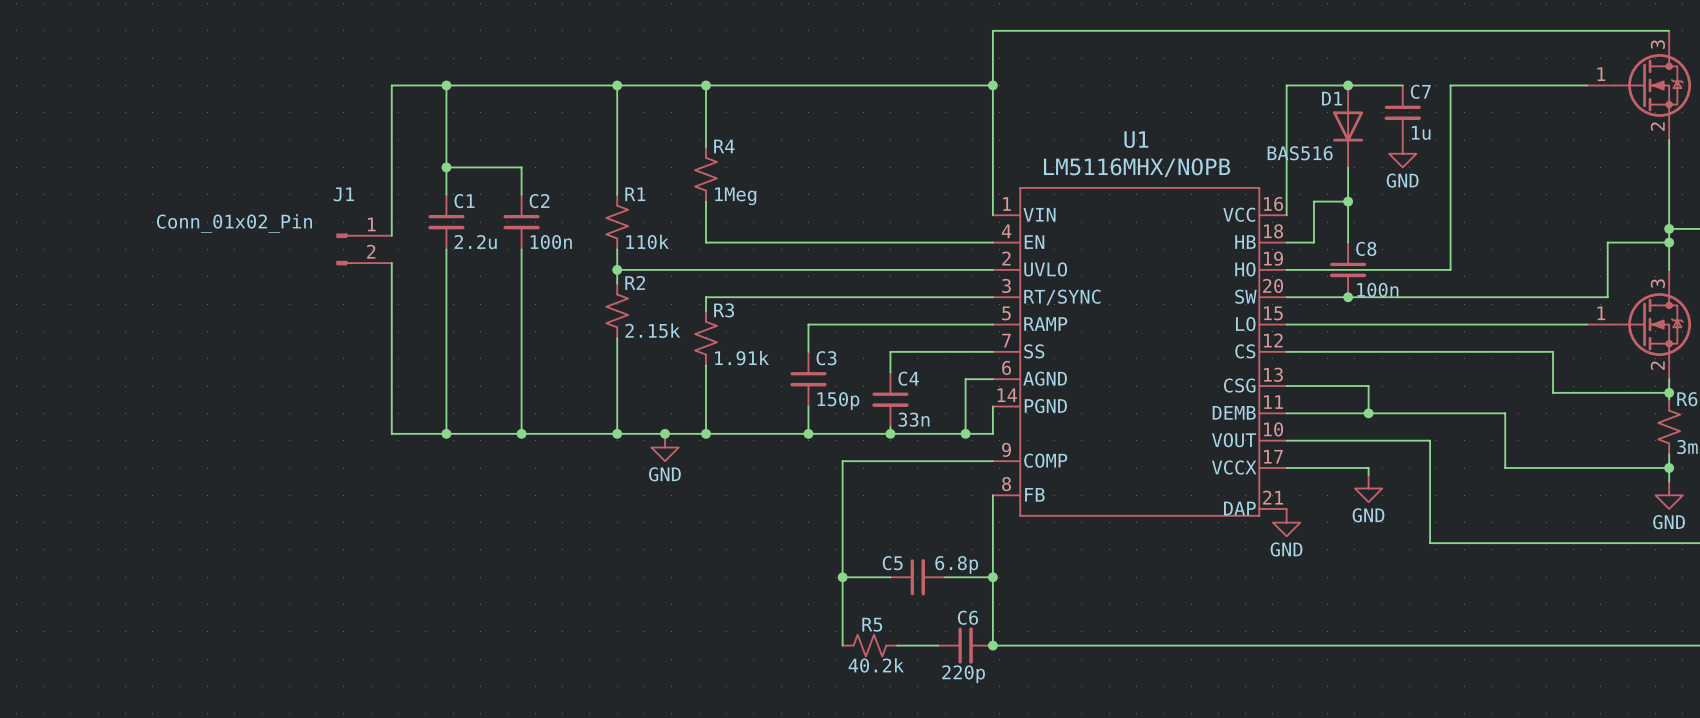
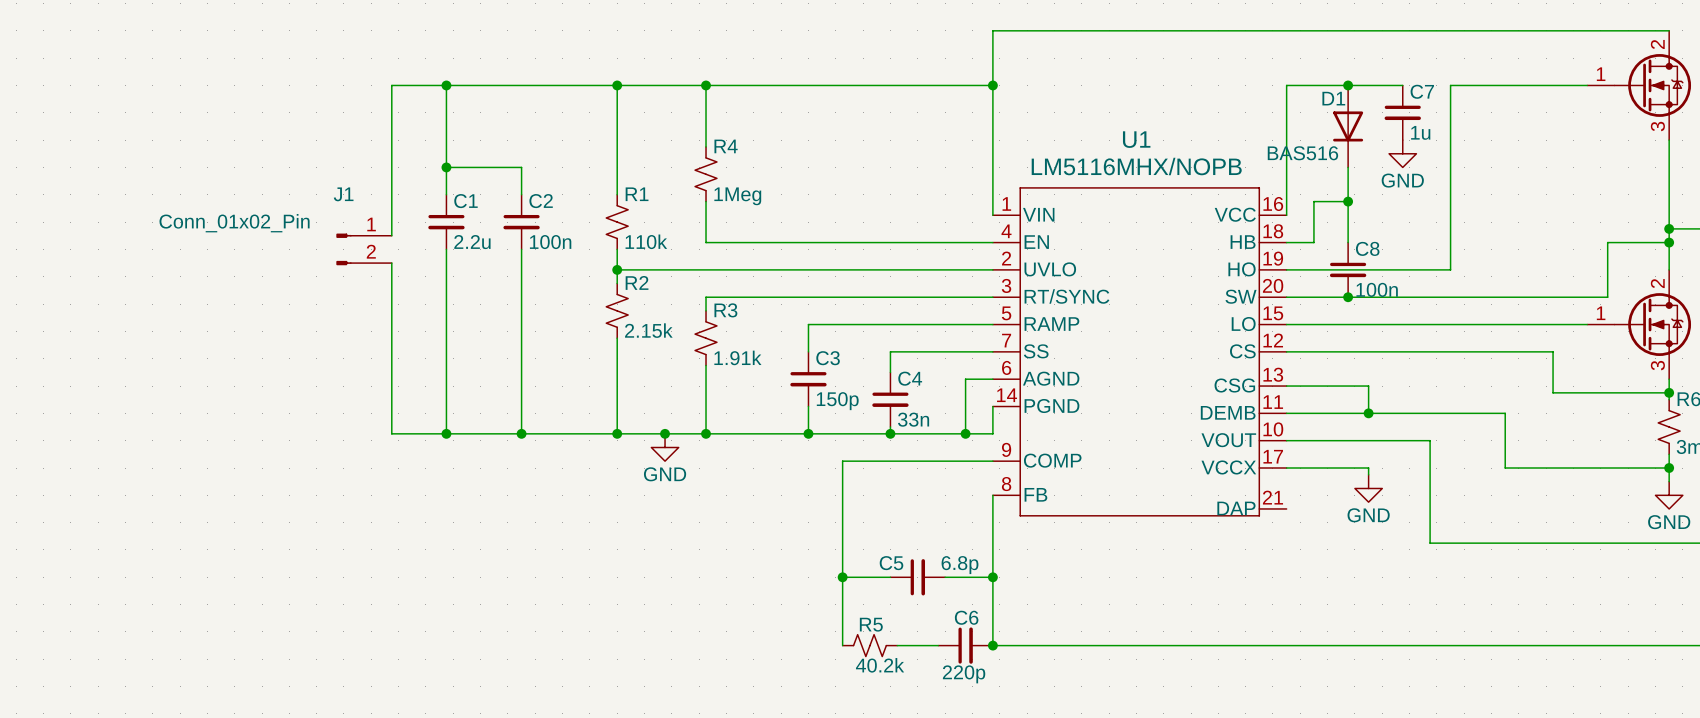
part pin number: 3 (1657, 44) -> 2 (1657, 44)
part pin number: 2 (1657, 126) -> 3 (1657, 126)
part pin number: 3 (1657, 283) -> 2 (1657, 283)
part pin number: 2 (1657, 365) -> 3 (1657, 365)
power symbol: GND (1286, 522) -> none

